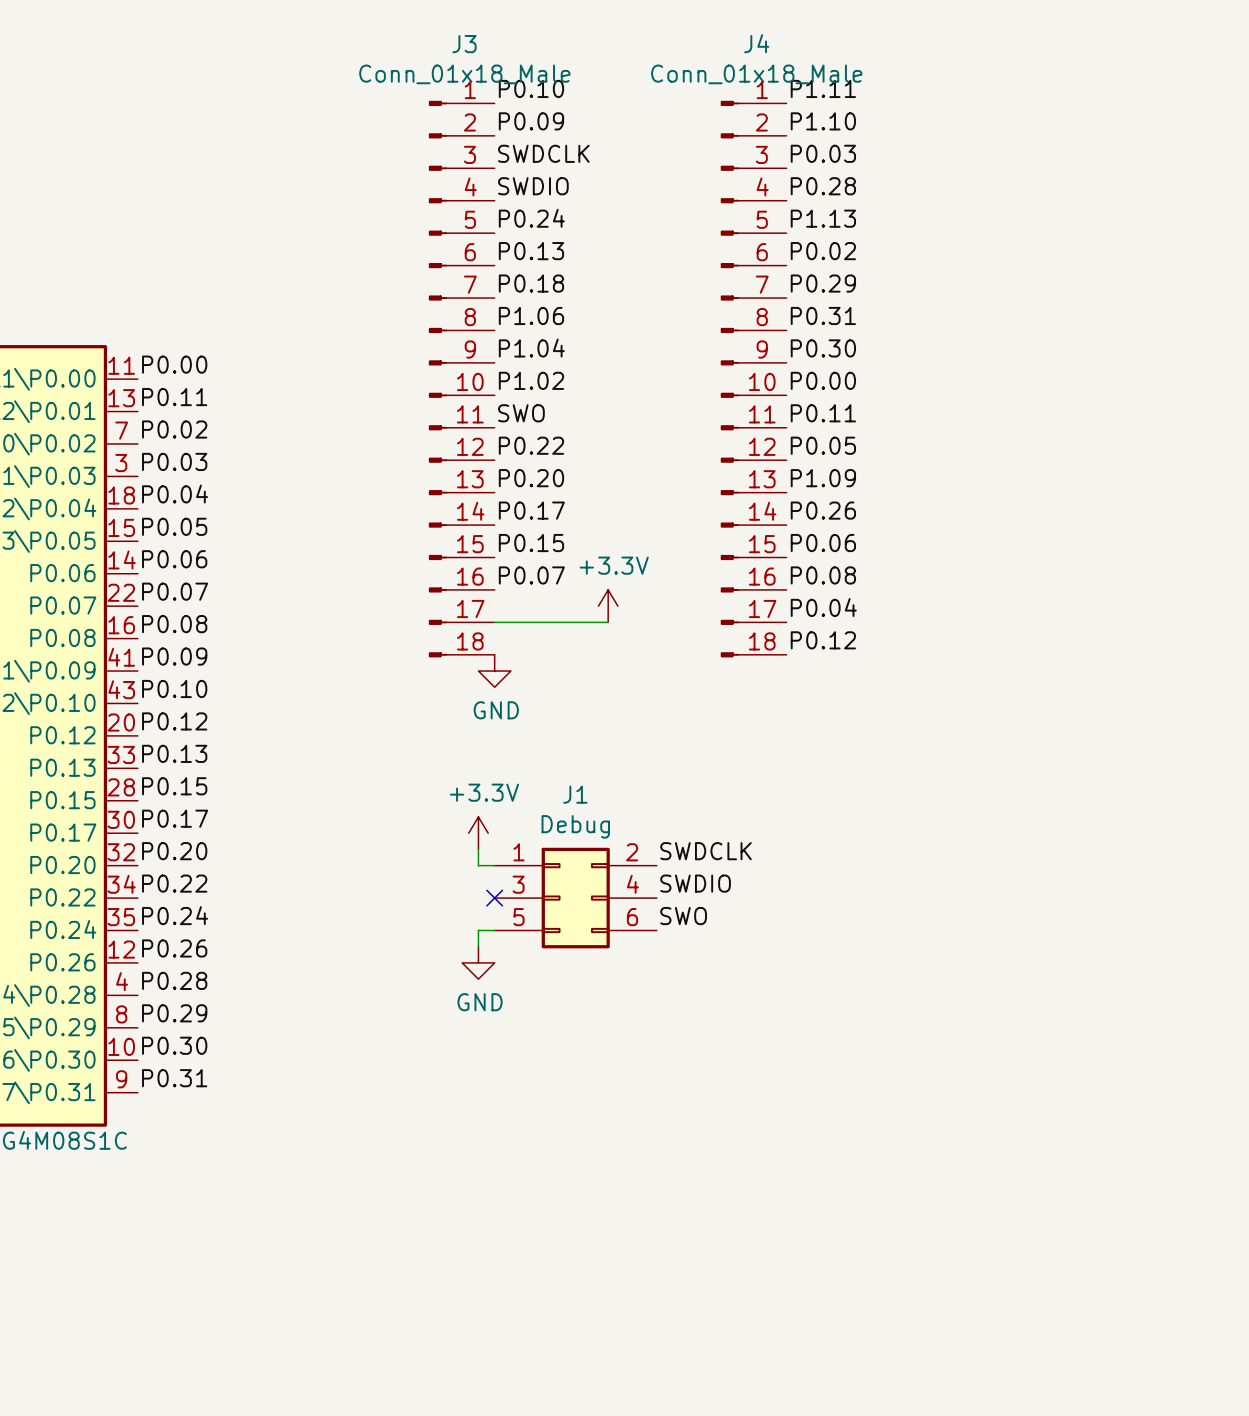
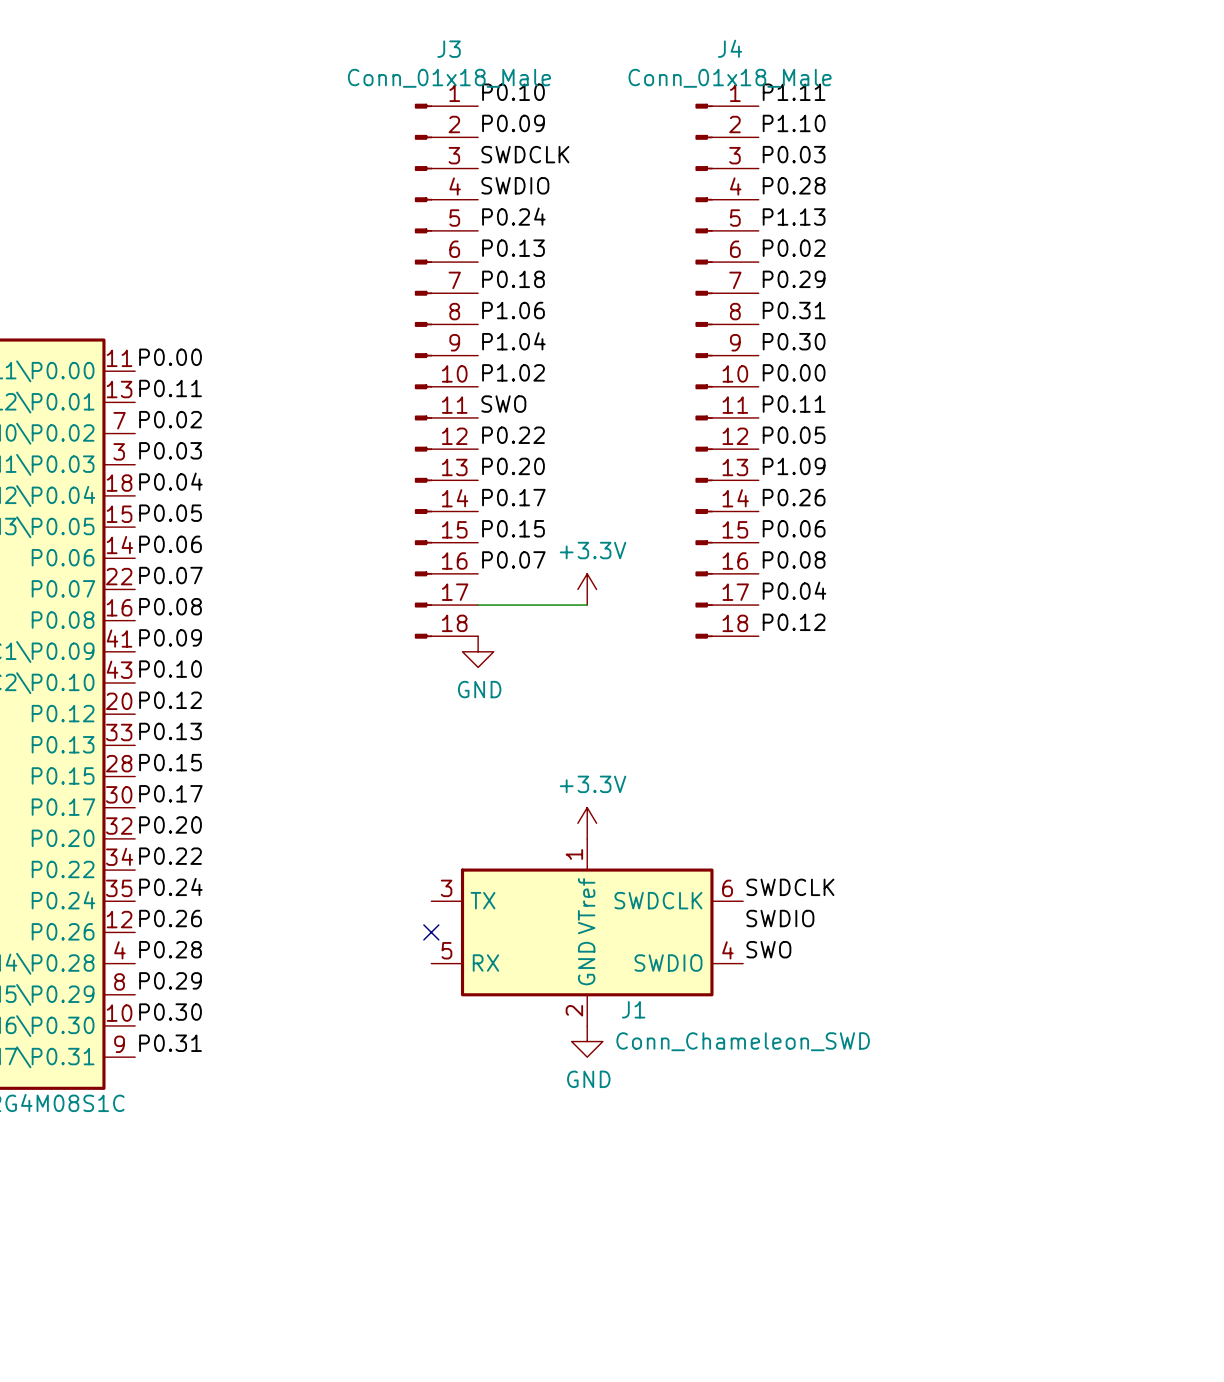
J1 name position: J1 (575, 794) -> J1 (633, 1009)
J1 value: Debug (575, 826) -> Conn_Chameleon_SWD (743, 1041)
power symbol position: +3.3V (478, 833) -> +3.3V (587, 823)
J1 symbol: [494, 847, 657, 949] -> [431, 838, 744, 1026]
wire: (478, 849) (478, 865) (494, 865) -> none
label position: SWDCLK (705, 851) -> SWDCLK (790, 887)
label position: SWDIO (695, 883) -> SWDIO (780, 918)
no-connect mark: (494, 898) -> none
label position: SWO (683, 916) -> SWO (768, 949)
no-connect mark: none -> (431, 932)
power symbol position: GND (478, 962) -> GND (587, 1041)

